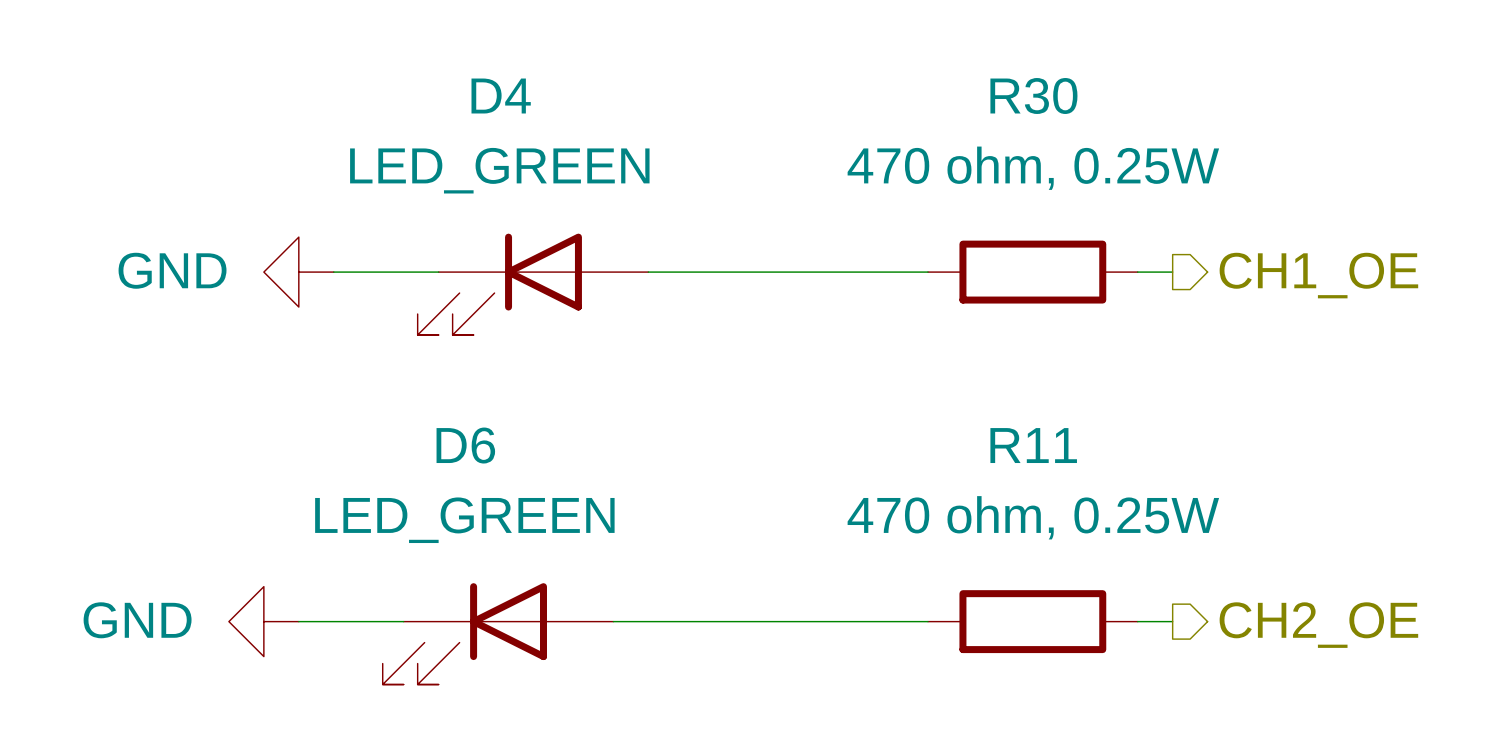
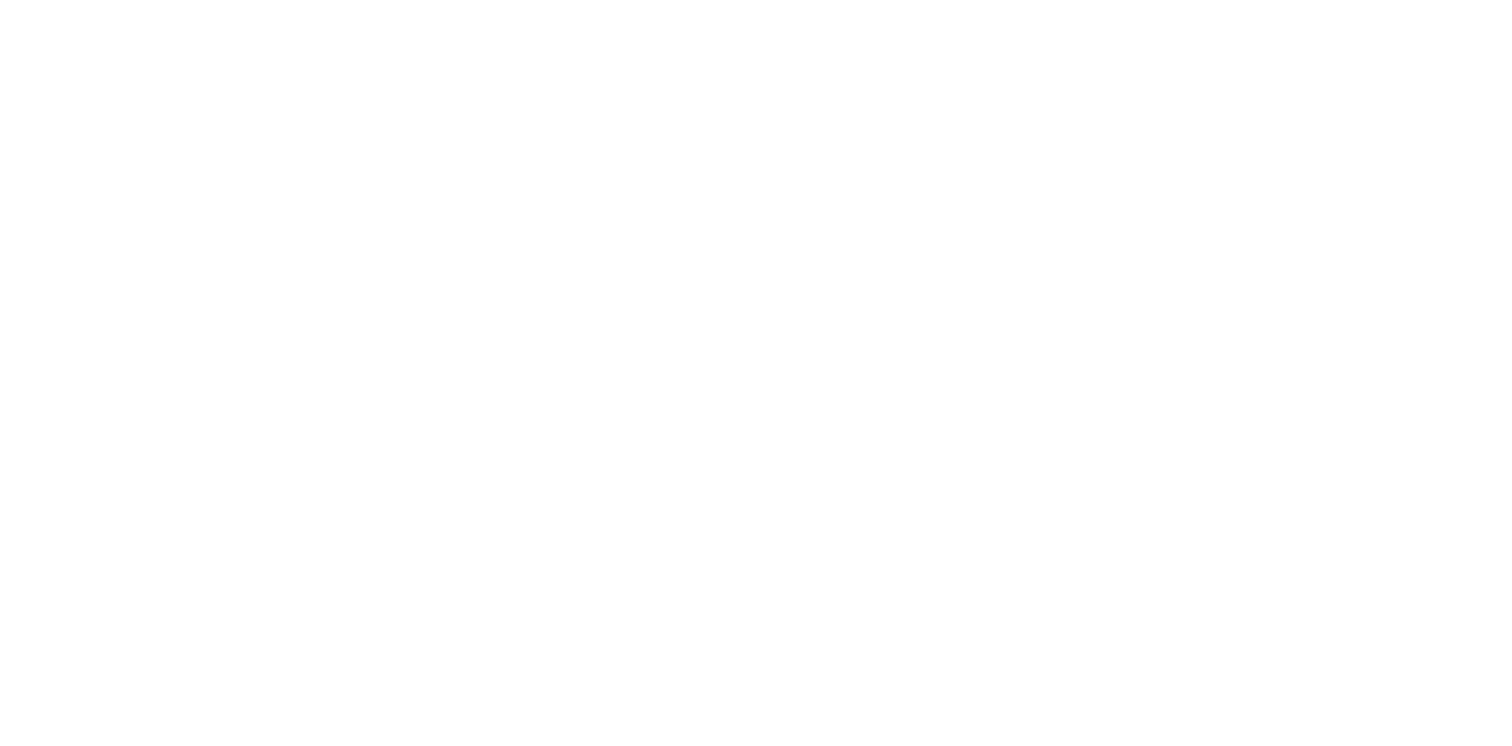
power symbol: GND (298, 272) -> none
wire: (333, 272) (438, 272) -> none
wire: (648, 272) (927, 272) -> none
R30: 470 ohm, 0.25W (1032, 272) -> none
wire: (1137, 272) (1172, 272) -> none
hierarchical label: CH1_OE (1318, 275) -> none
D4: LED_GREEN (533, 284) -> none
power symbol: GND (263, 621) -> none
wire: (298, 621) (403, 621) -> none
wire: (613, 621) (927, 621) -> none
R11: 470 ohm, 0.25W (1032, 621) -> none
wire: (1137, 621) (1172, 621) -> none
hierarchical label: CH2_OE (1318, 625) -> none
D6: LED_GREEN (498, 633) -> none

